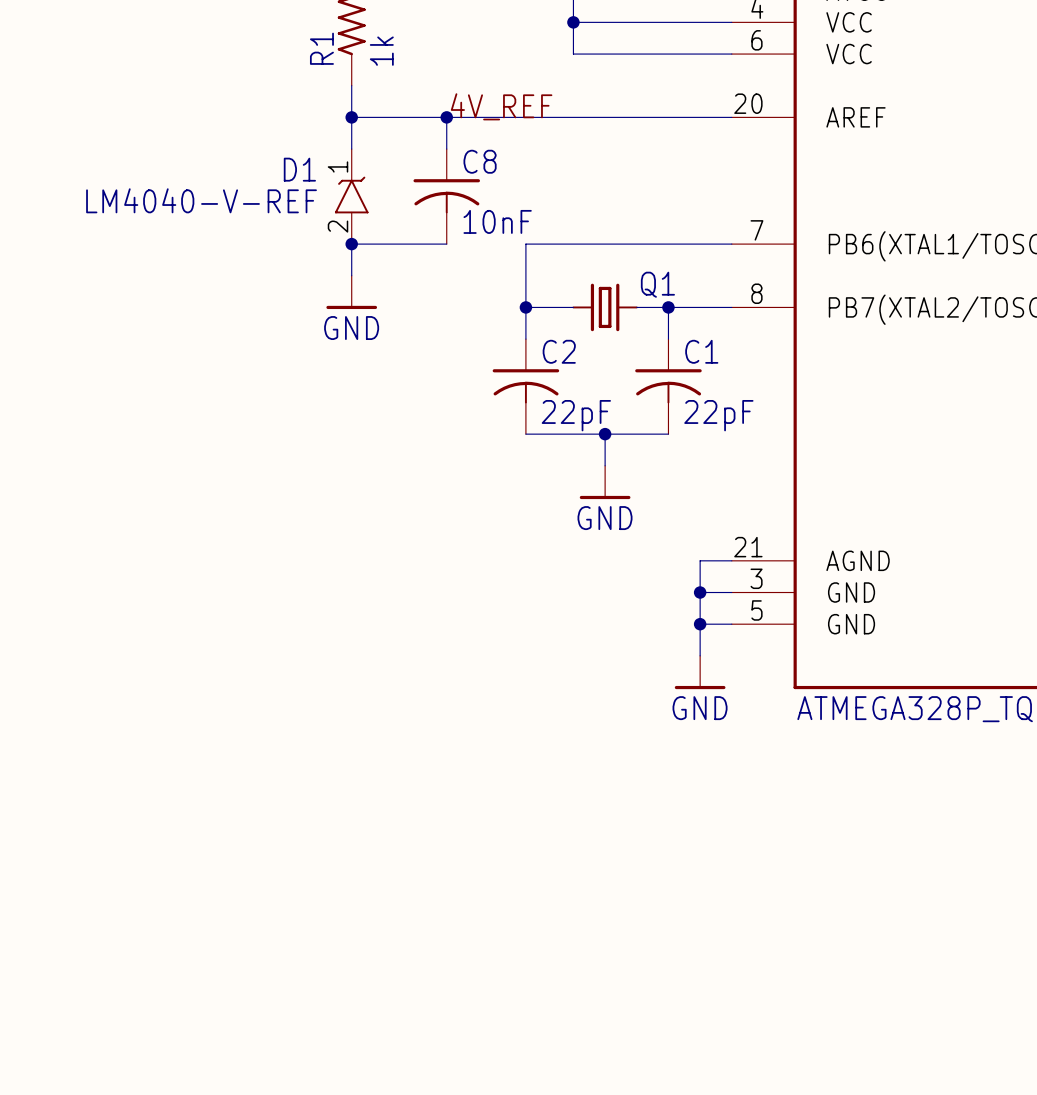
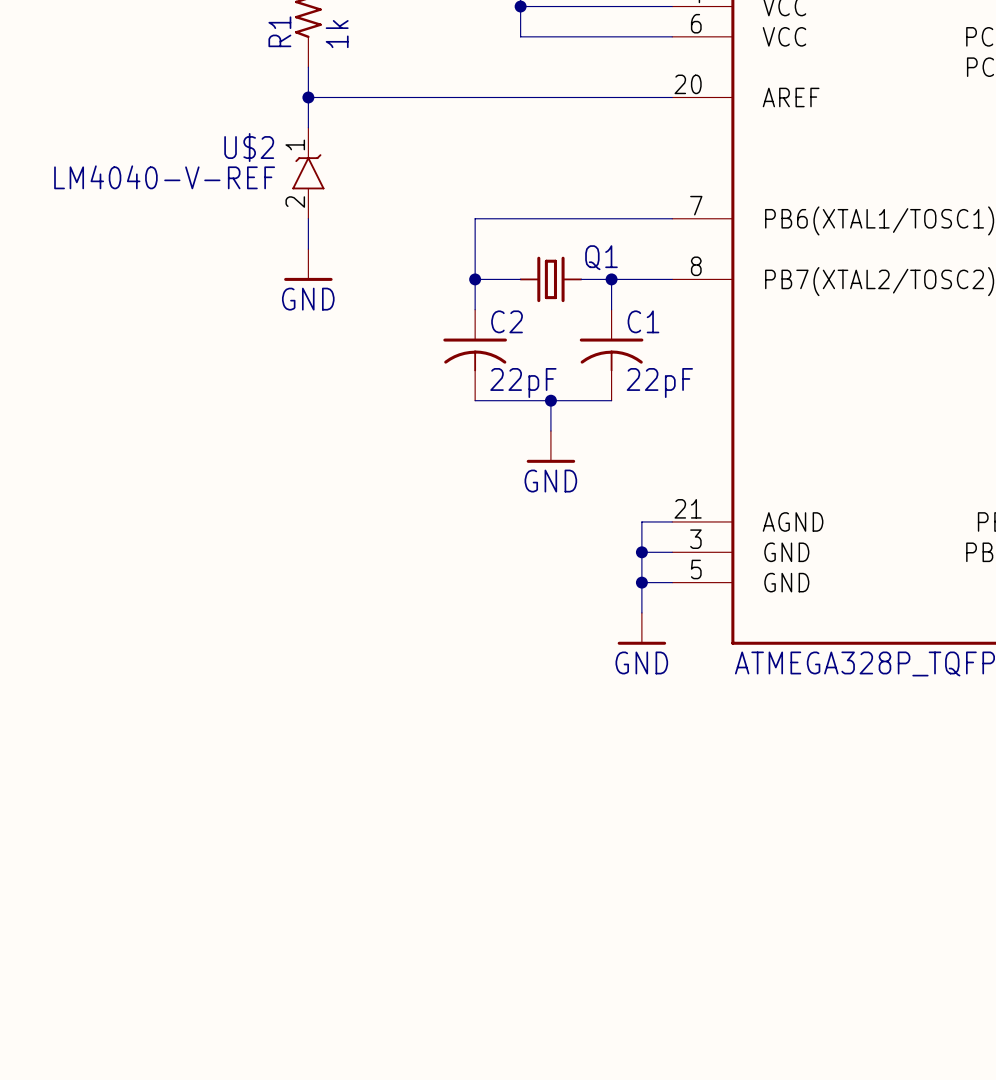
label: 4V_REF (501, 106) -> none
wire: (446, 117) (446, 149) -> none
junction: (446, 117) -> none
D1 name: D1 (299, 169) -> U$2 (249, 147)
C8: 10nF (446, 196) -> none
wire: (351, 244) (446, 244) -> none
junction: (351, 244) -> none

